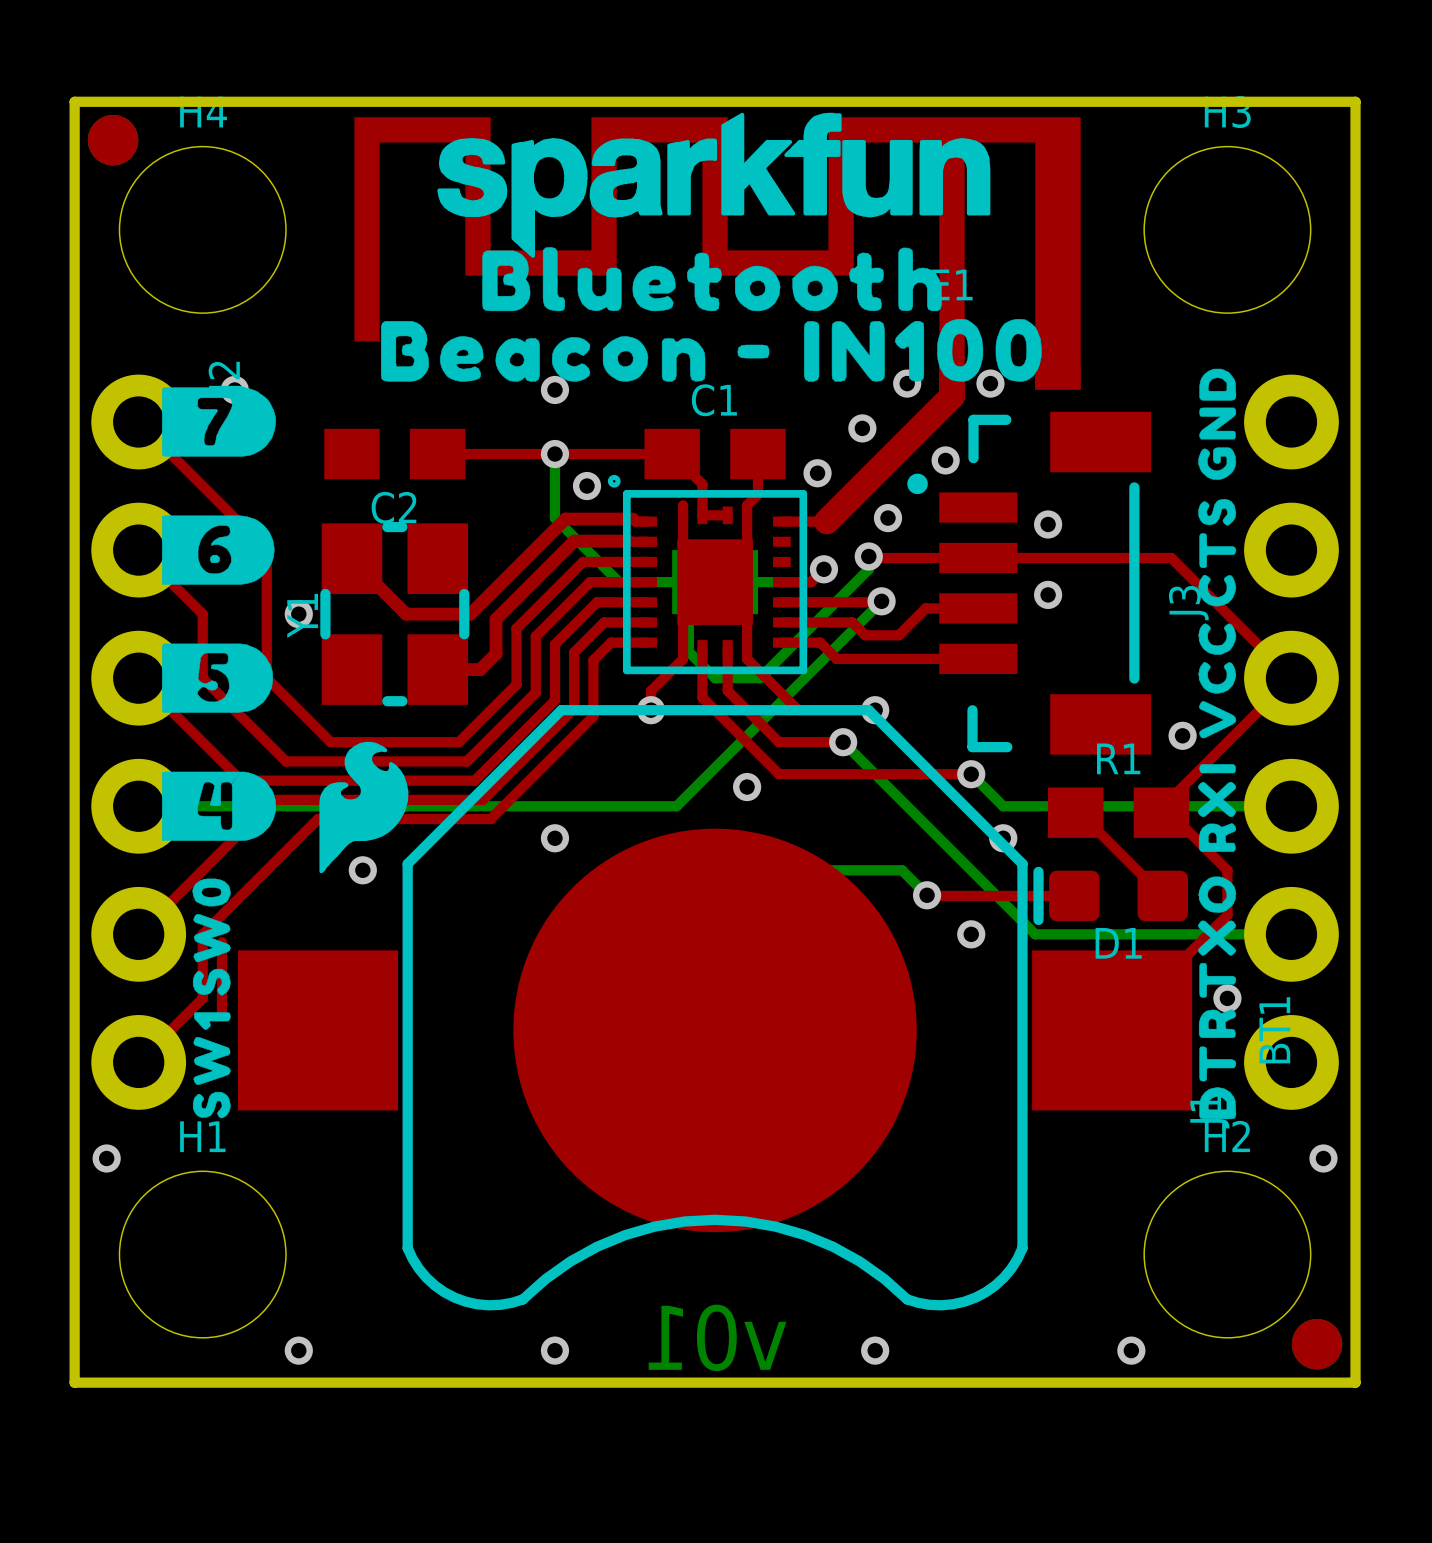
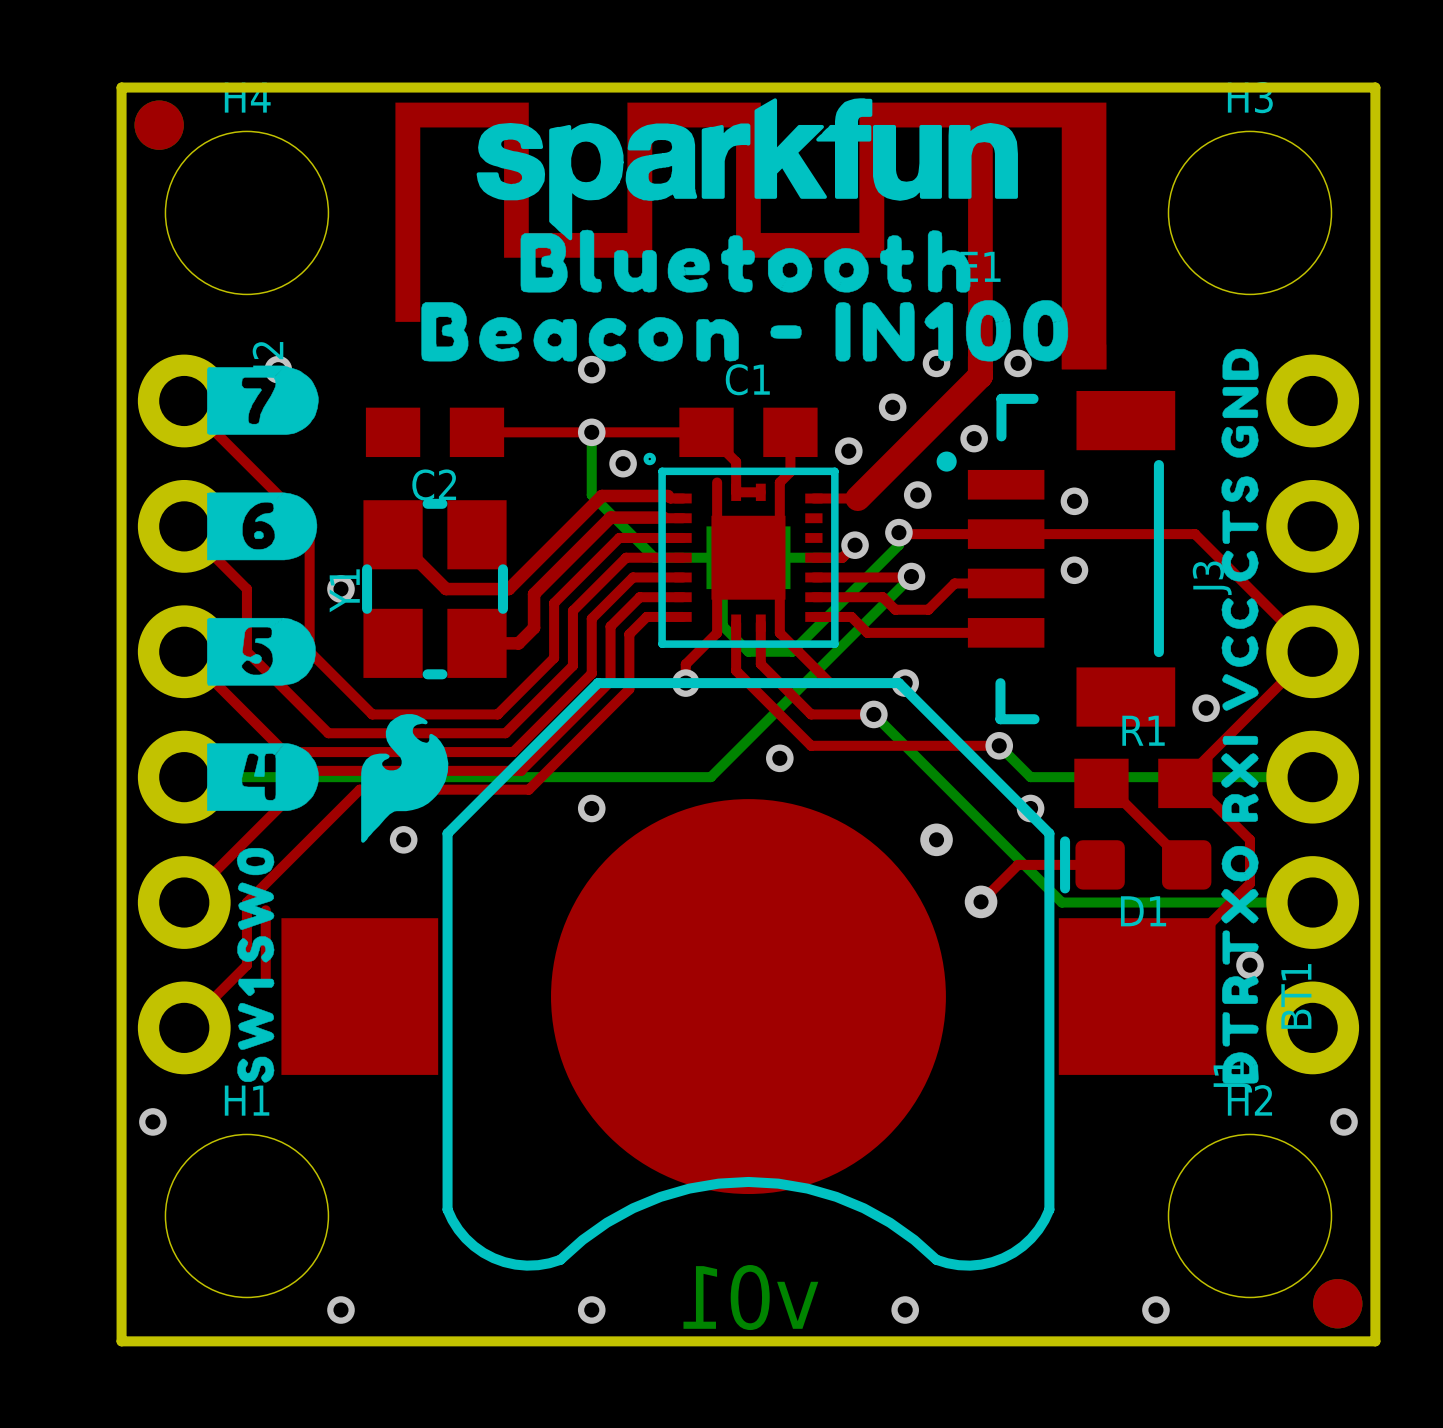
bottom track: (741, 870) (902, 870) (927, 895) -> none
top track: (927, 895) (990, 895) -> (981, 901) (1018, 864)
via position: (927, 895) -> (936, 839)
via position: (971, 934) -> (981, 901)

